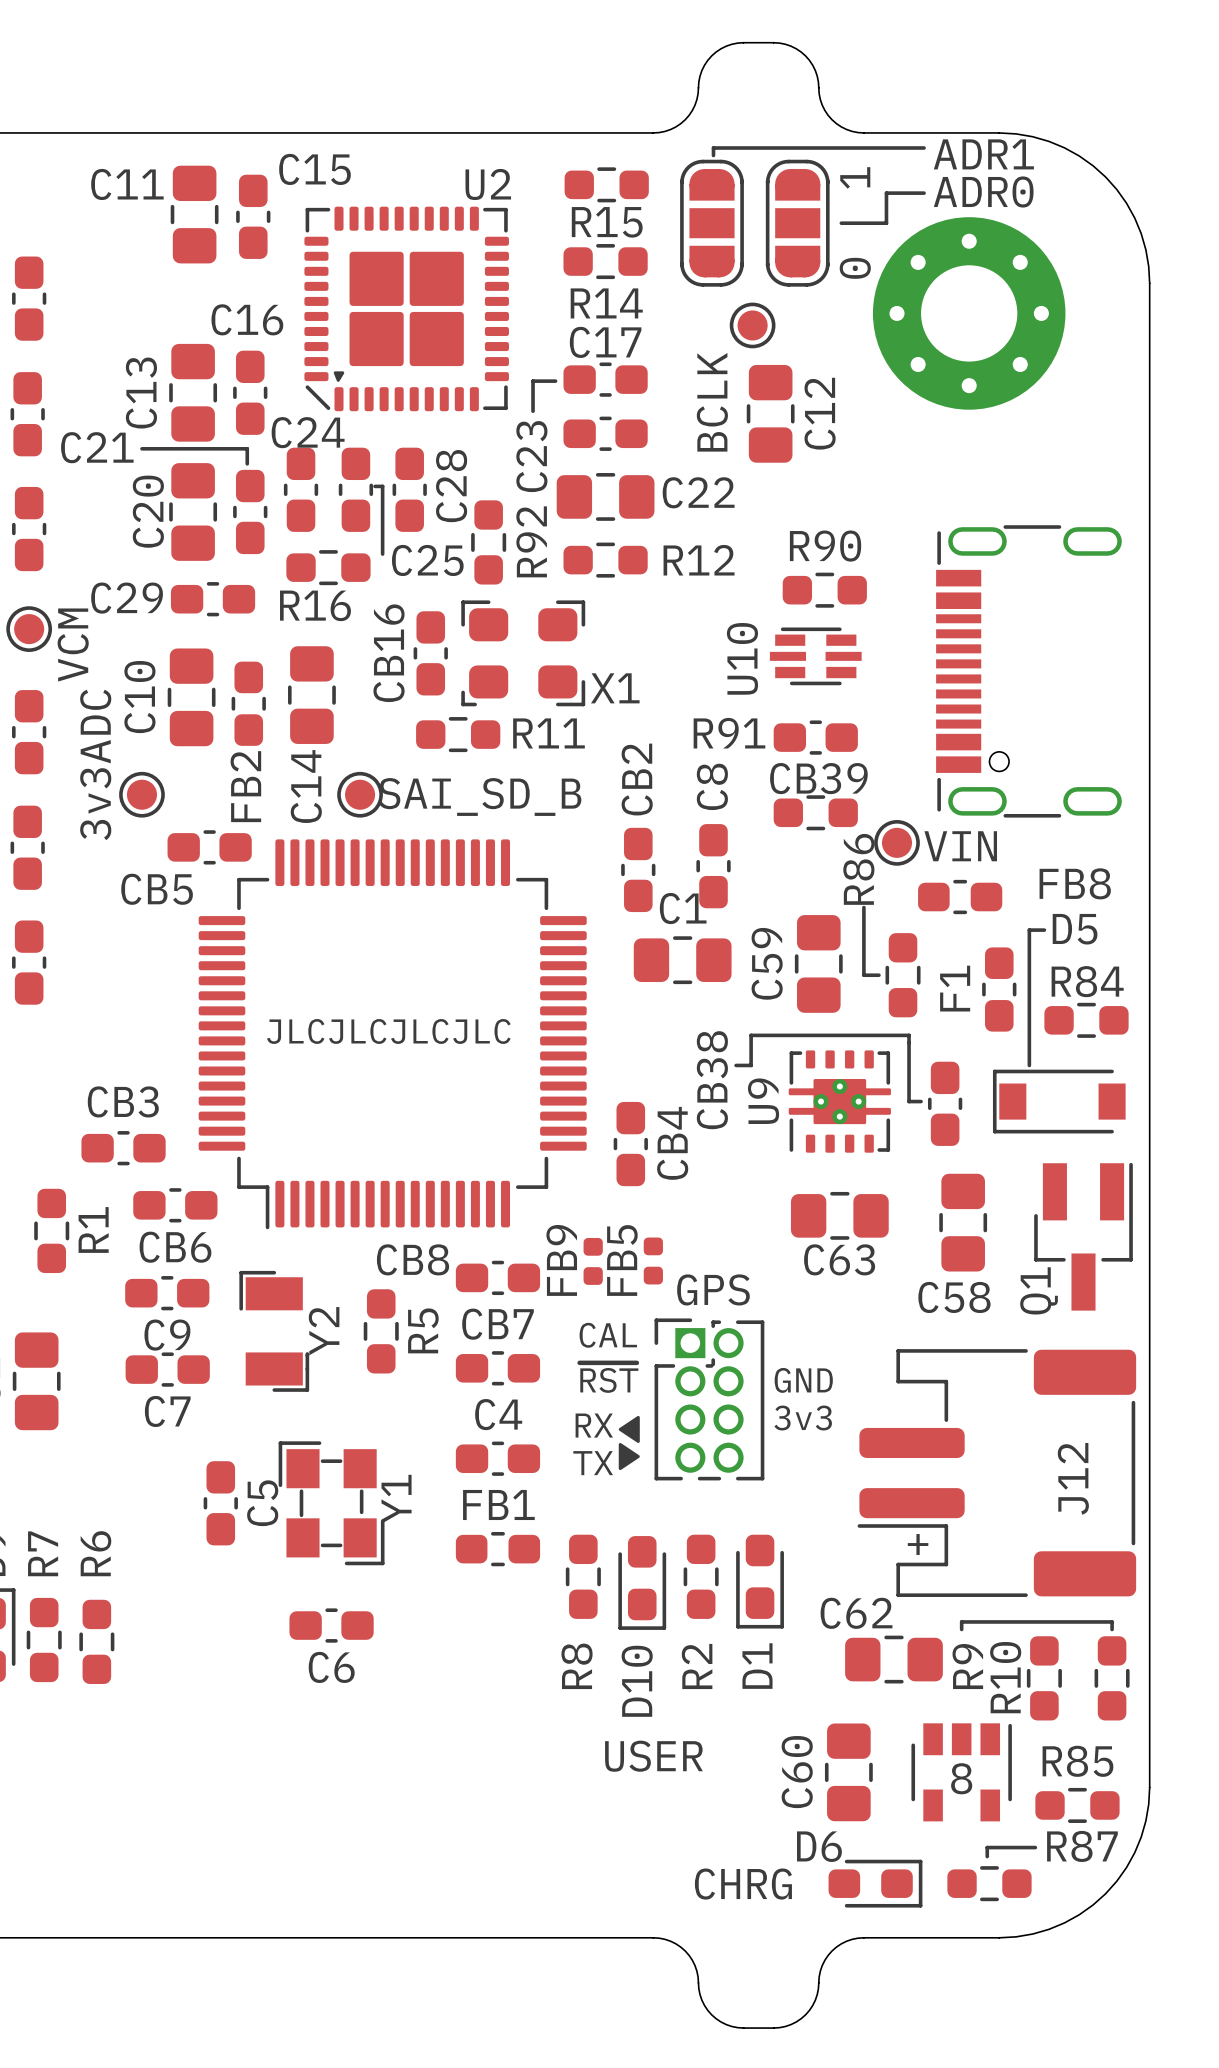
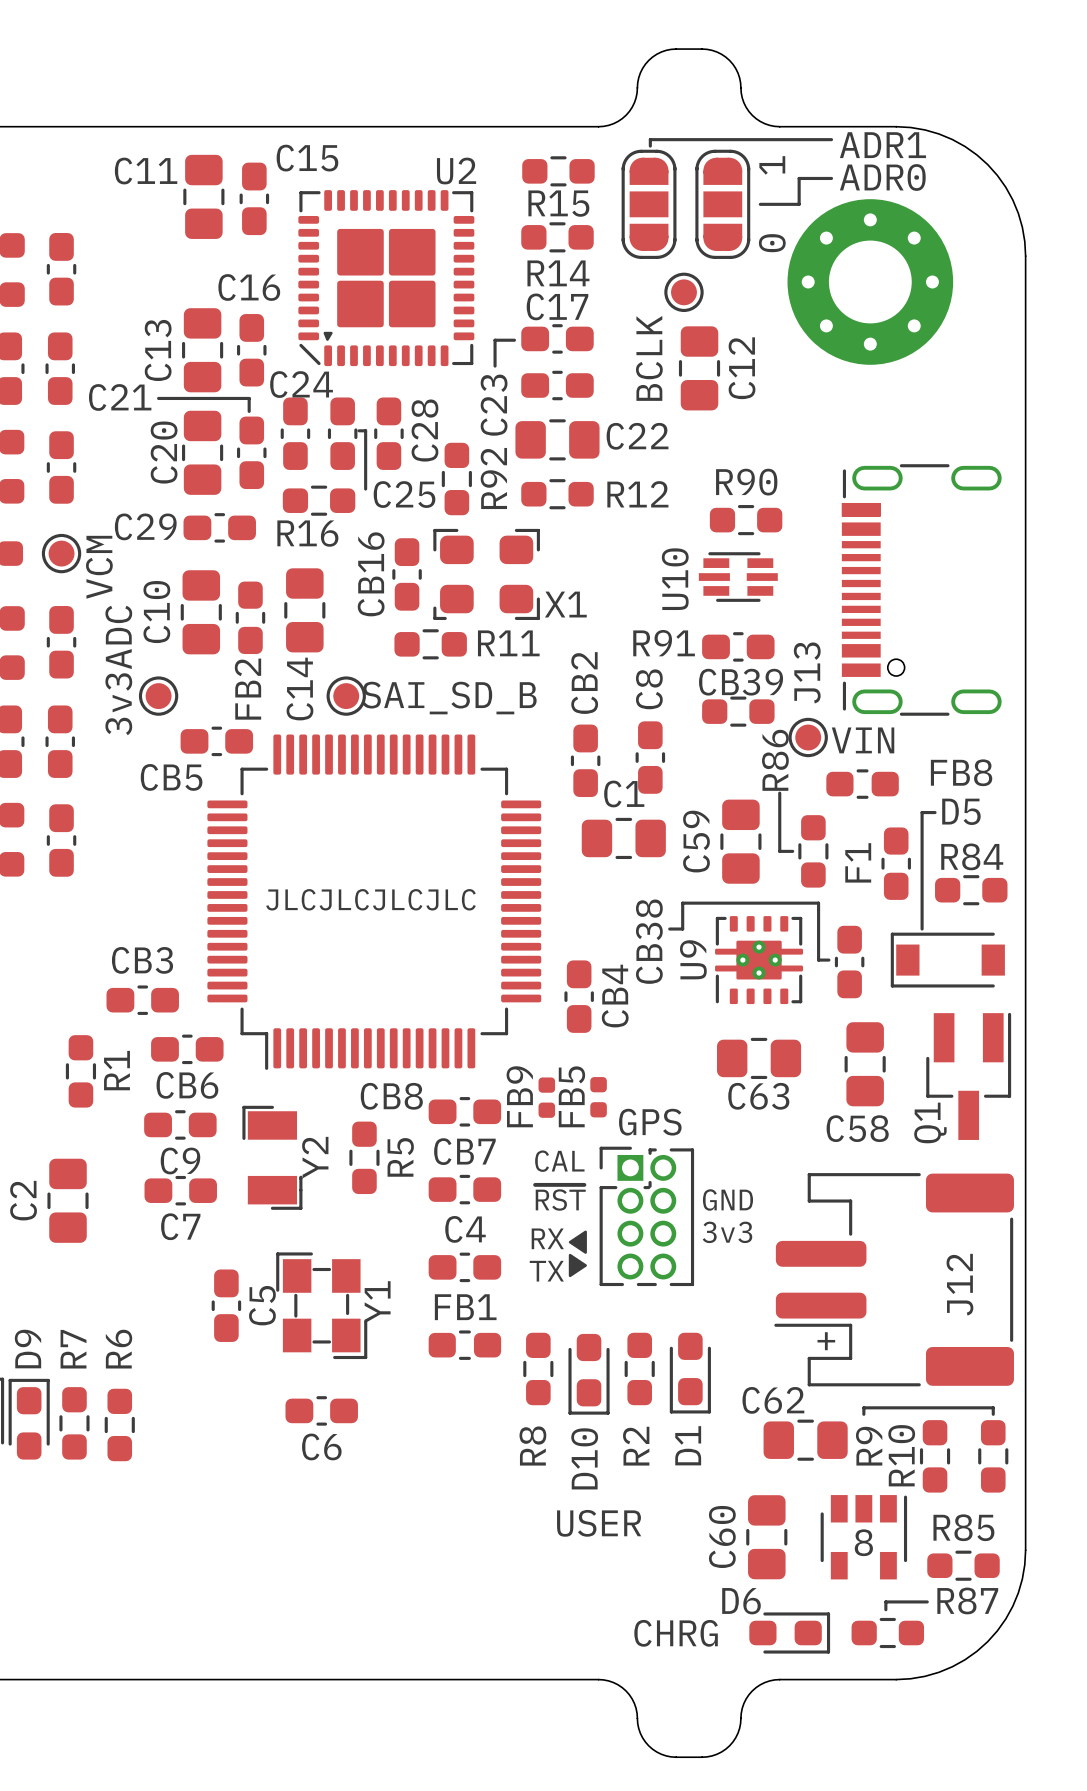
part: (1028, 671) -> none
J13: none -> (921, 589)

